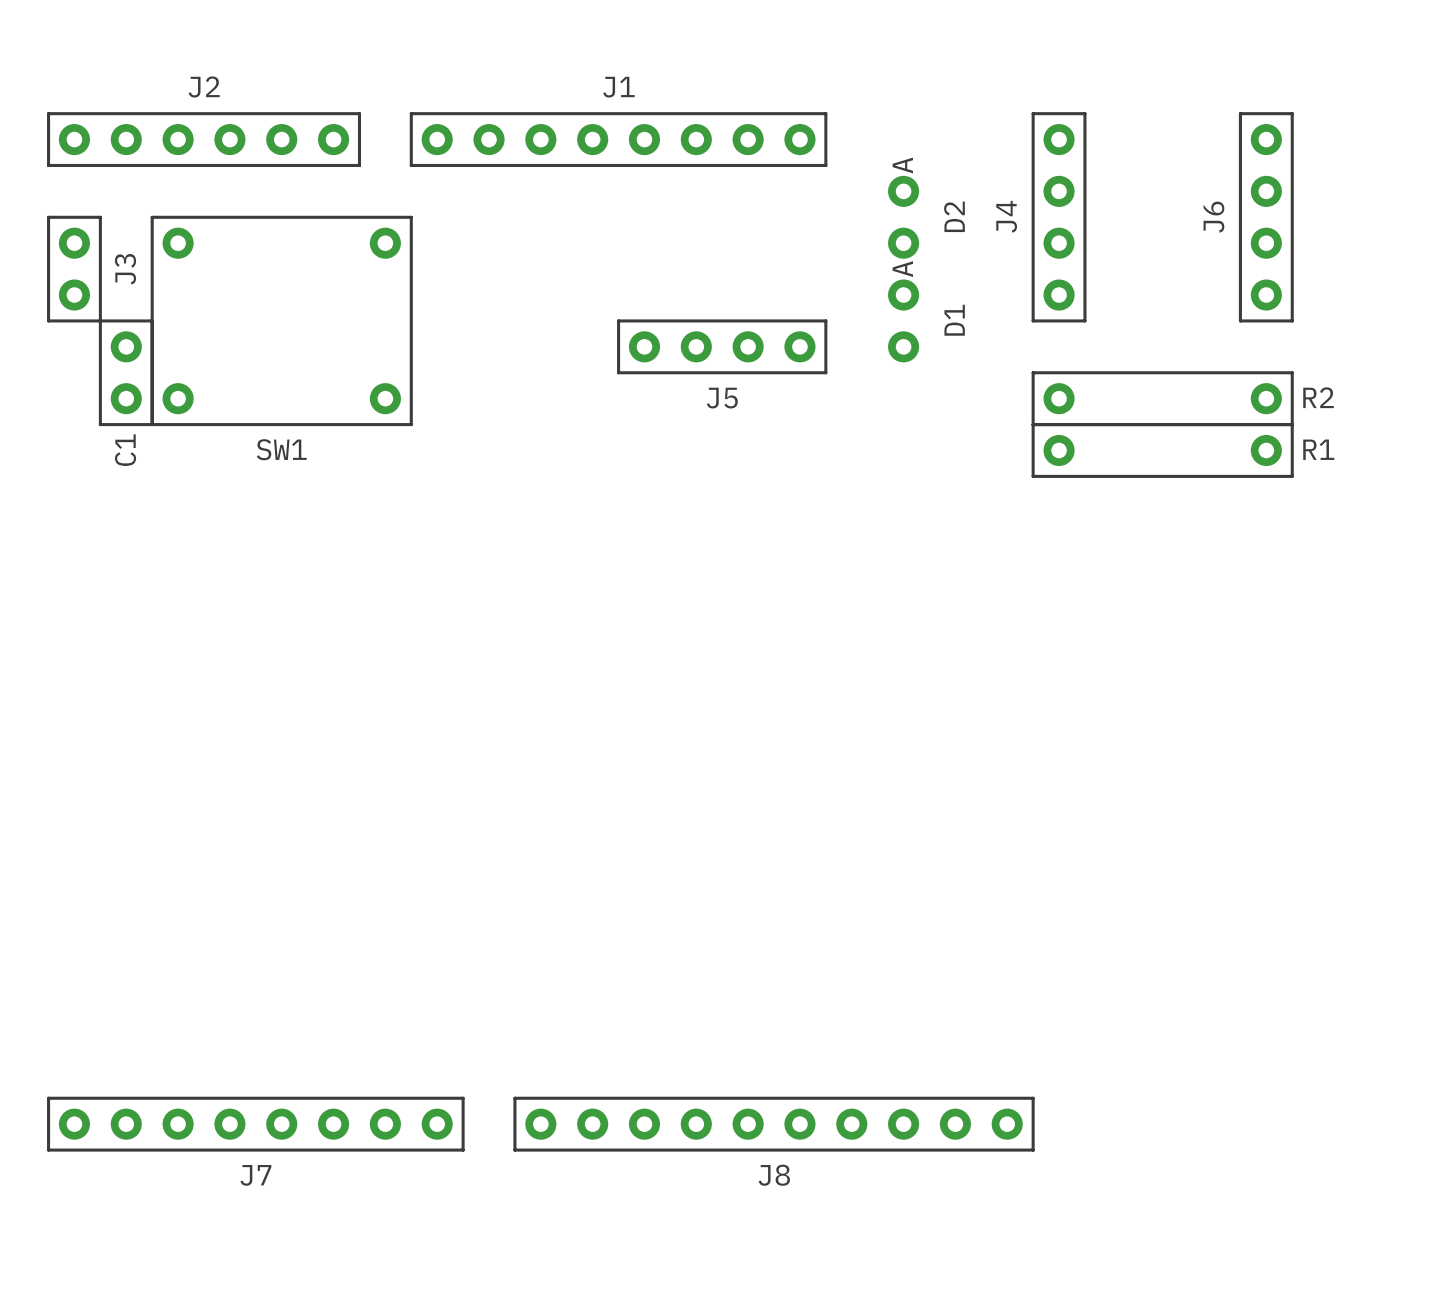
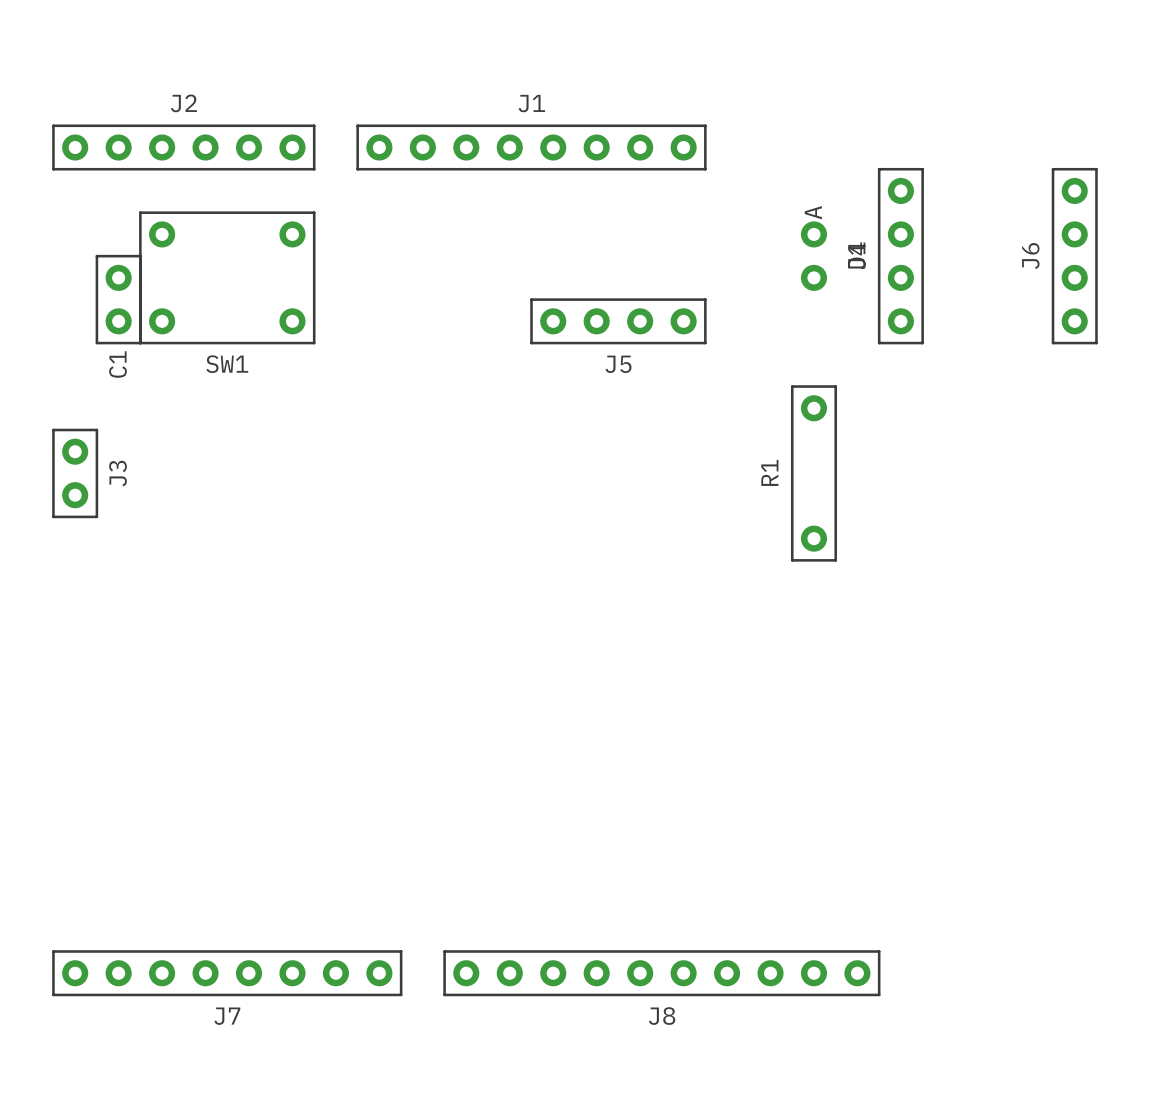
SW1 footprint: [150, 215, 413, 427] -> [139, 211, 316, 345]
D2: (903, 217) -> none
J4 position: (1059, 217) -> (900, 256)
J6 position: (1266, 217) -> (1074, 256)
J3 position: (74, 269) -> (75, 473)
D1 position: (903, 320) -> (813, 256)
C1 position: (126, 372) -> (118, 299)
R2: (1162, 398) -> none
R1 footprint: [1031, 423, 1294, 478] -> [790, 385, 838, 562]
R1 name position: R1 (1318, 449) -> R1 (769, 472)

